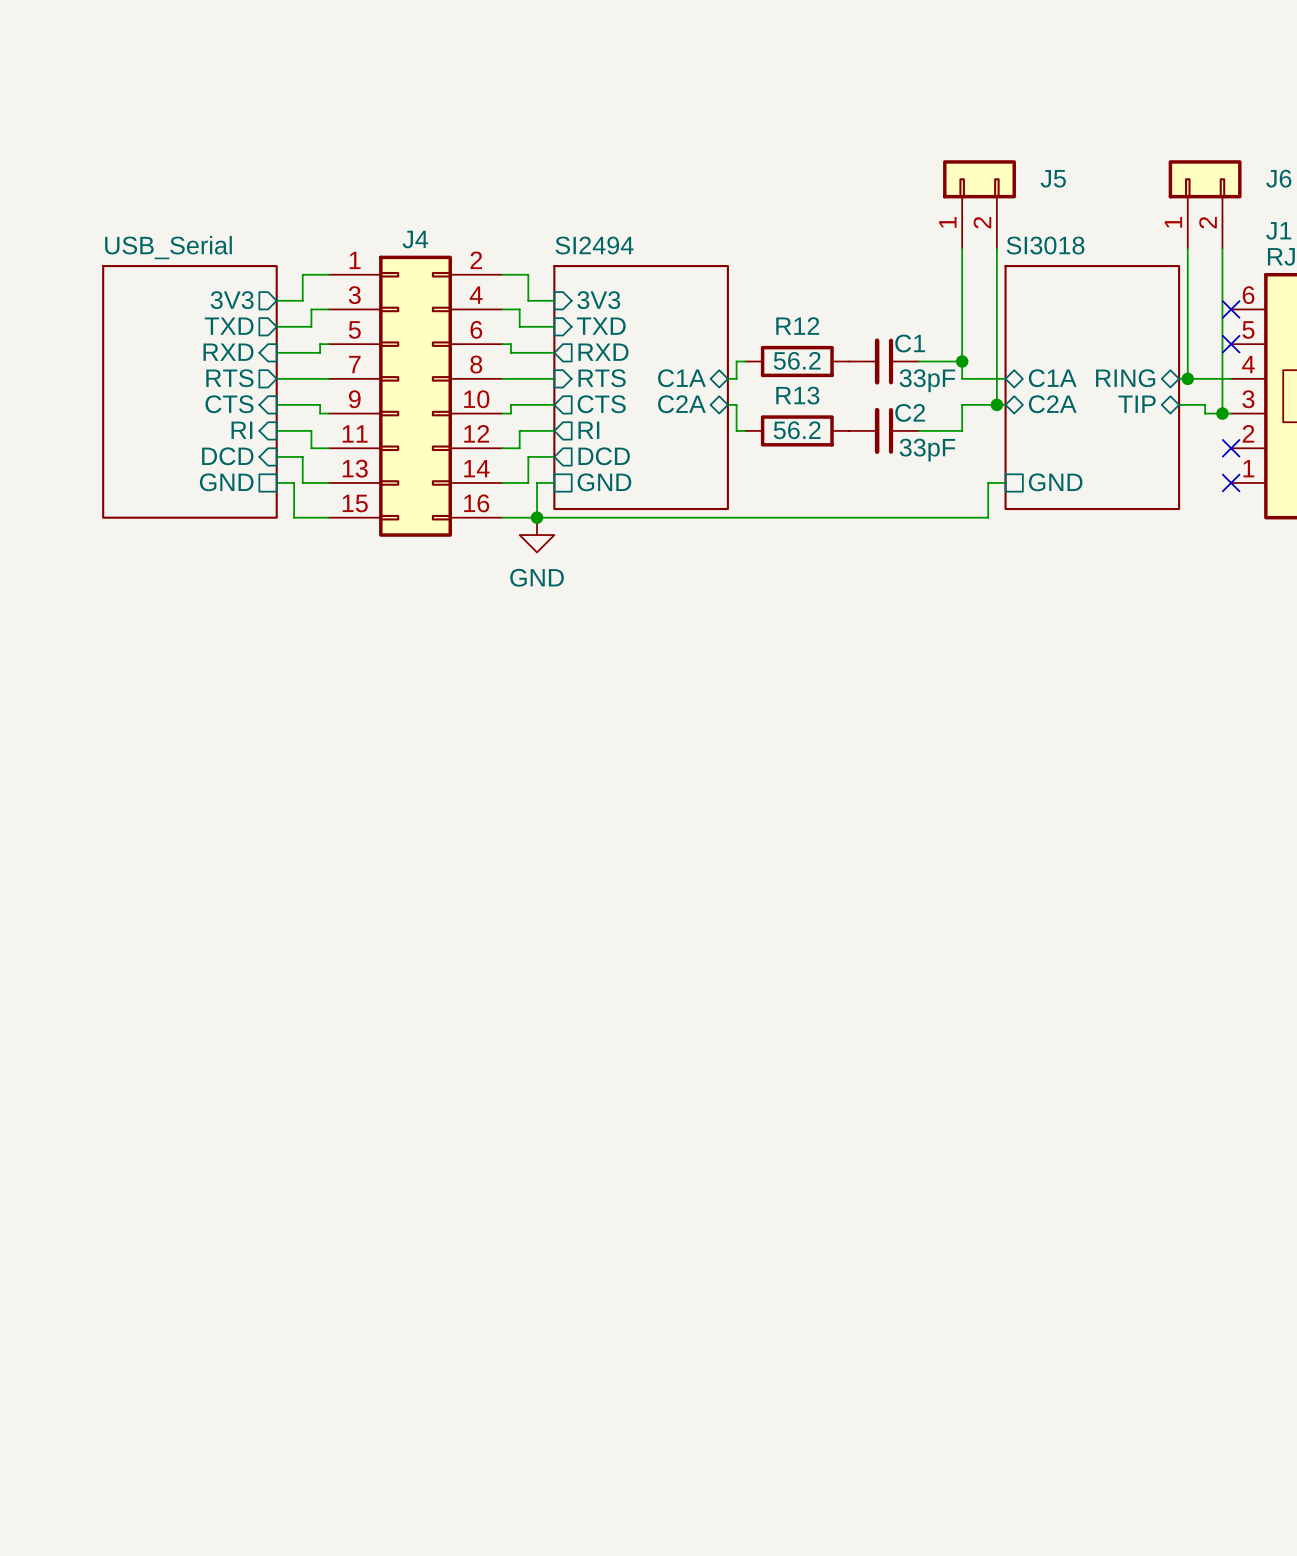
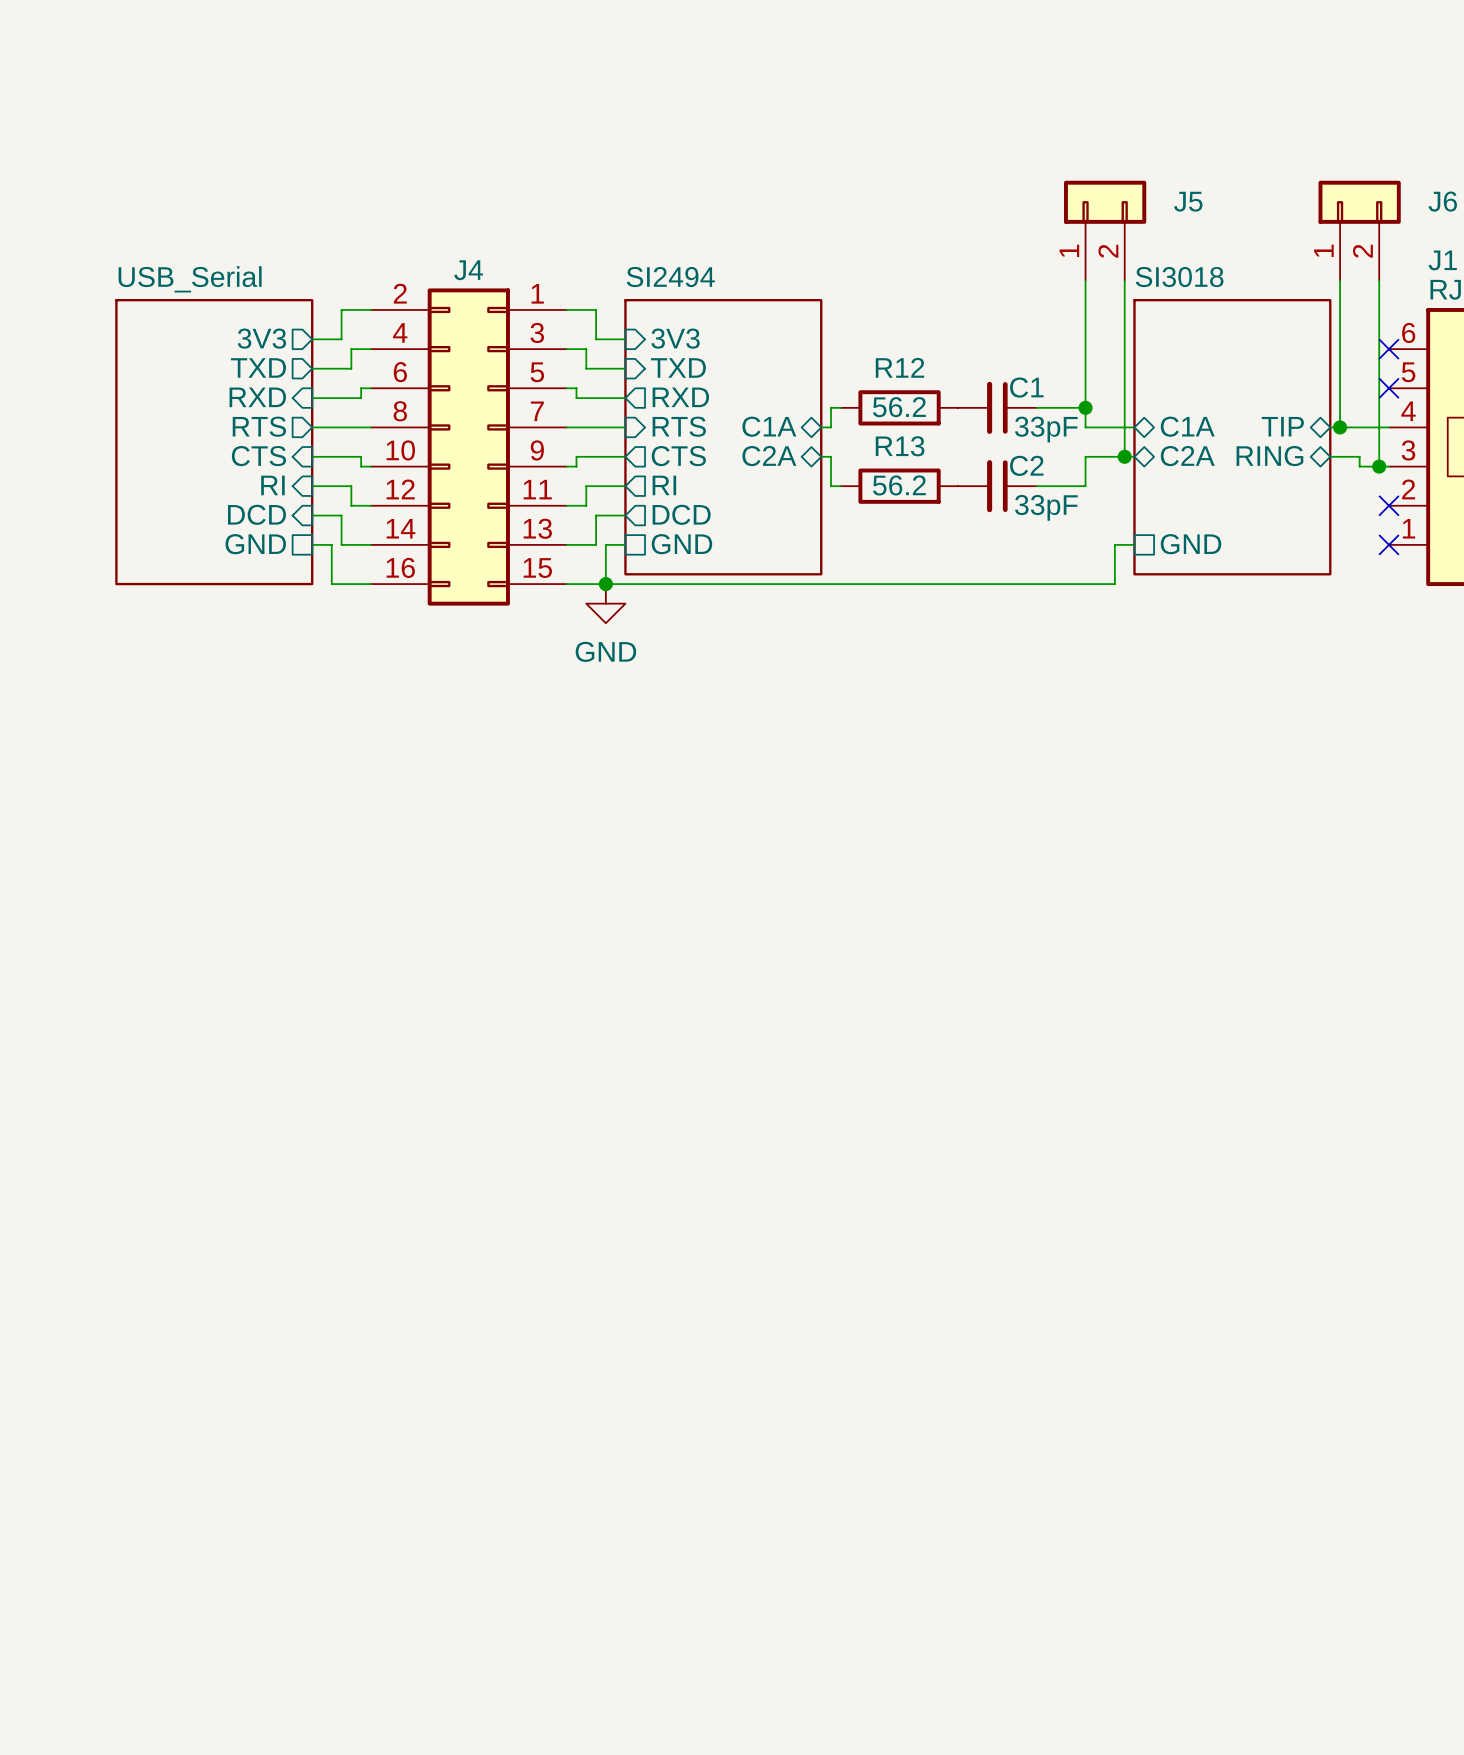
sheet pin: RING (1125, 378) -> TIP (1282, 426)
J4 flip: as is (415, 396) -> left-right (468, 447)
sheet pin: TIP (1137, 404) -> RING (1269, 456)

